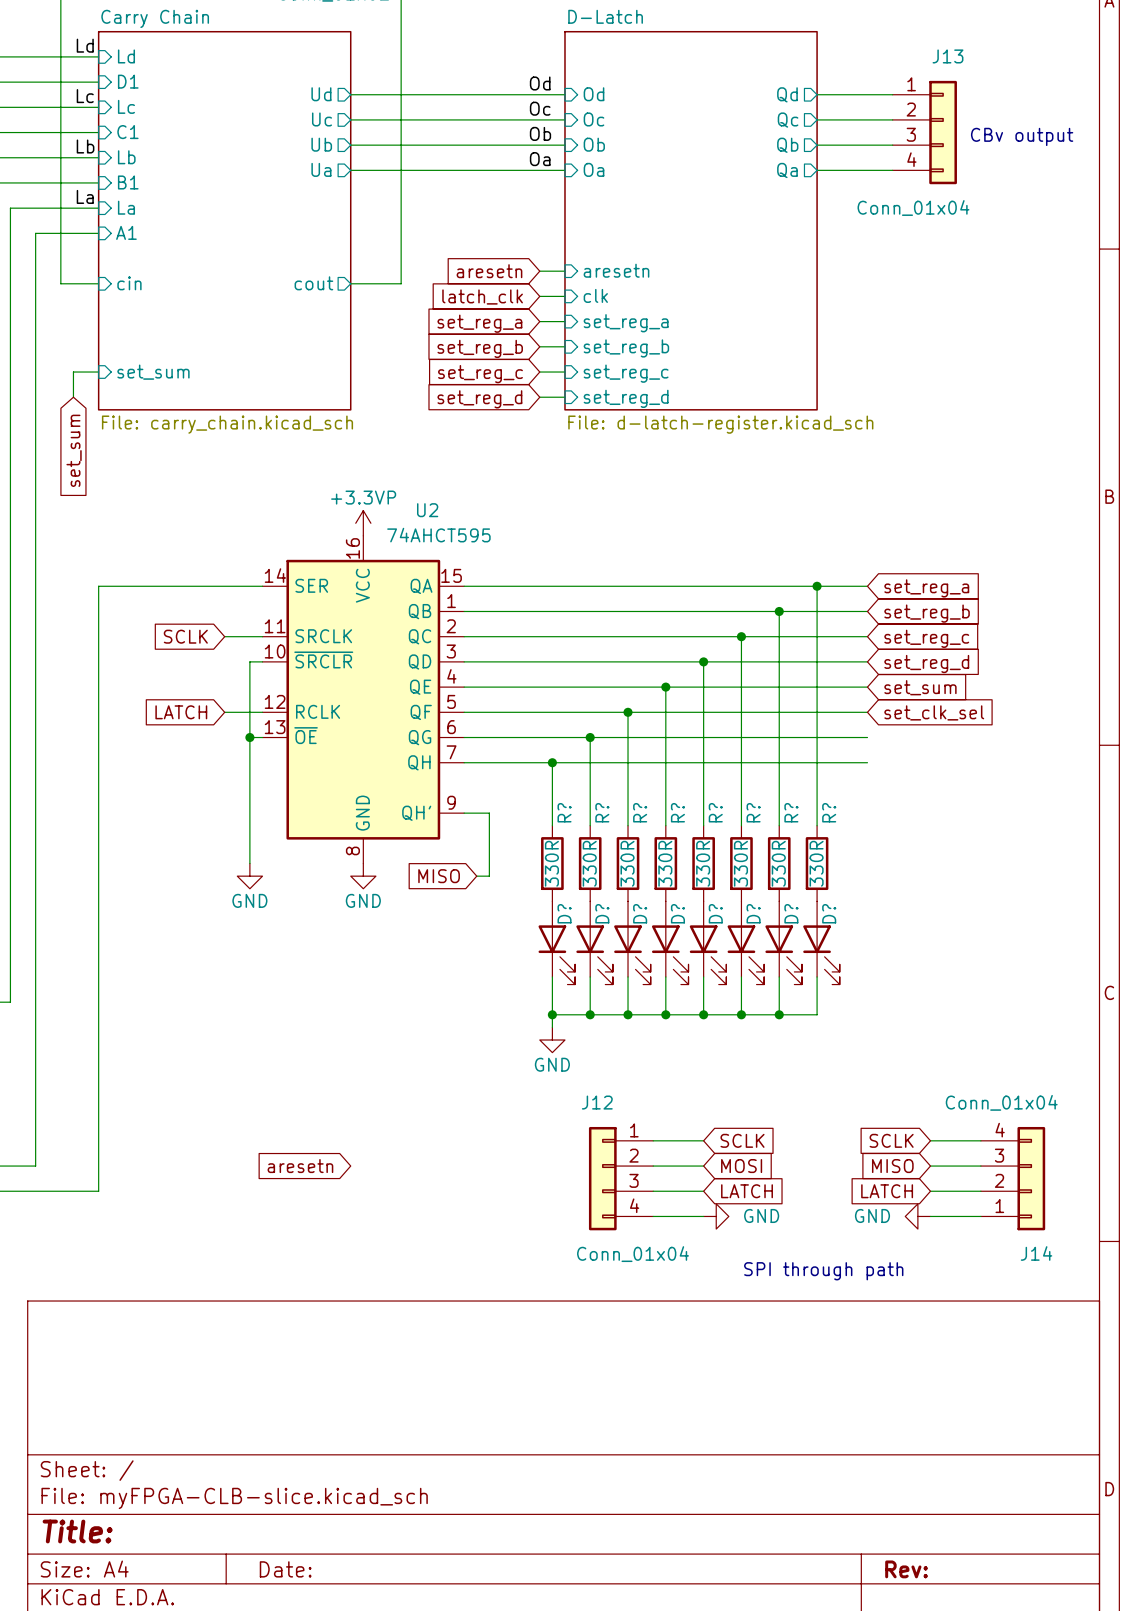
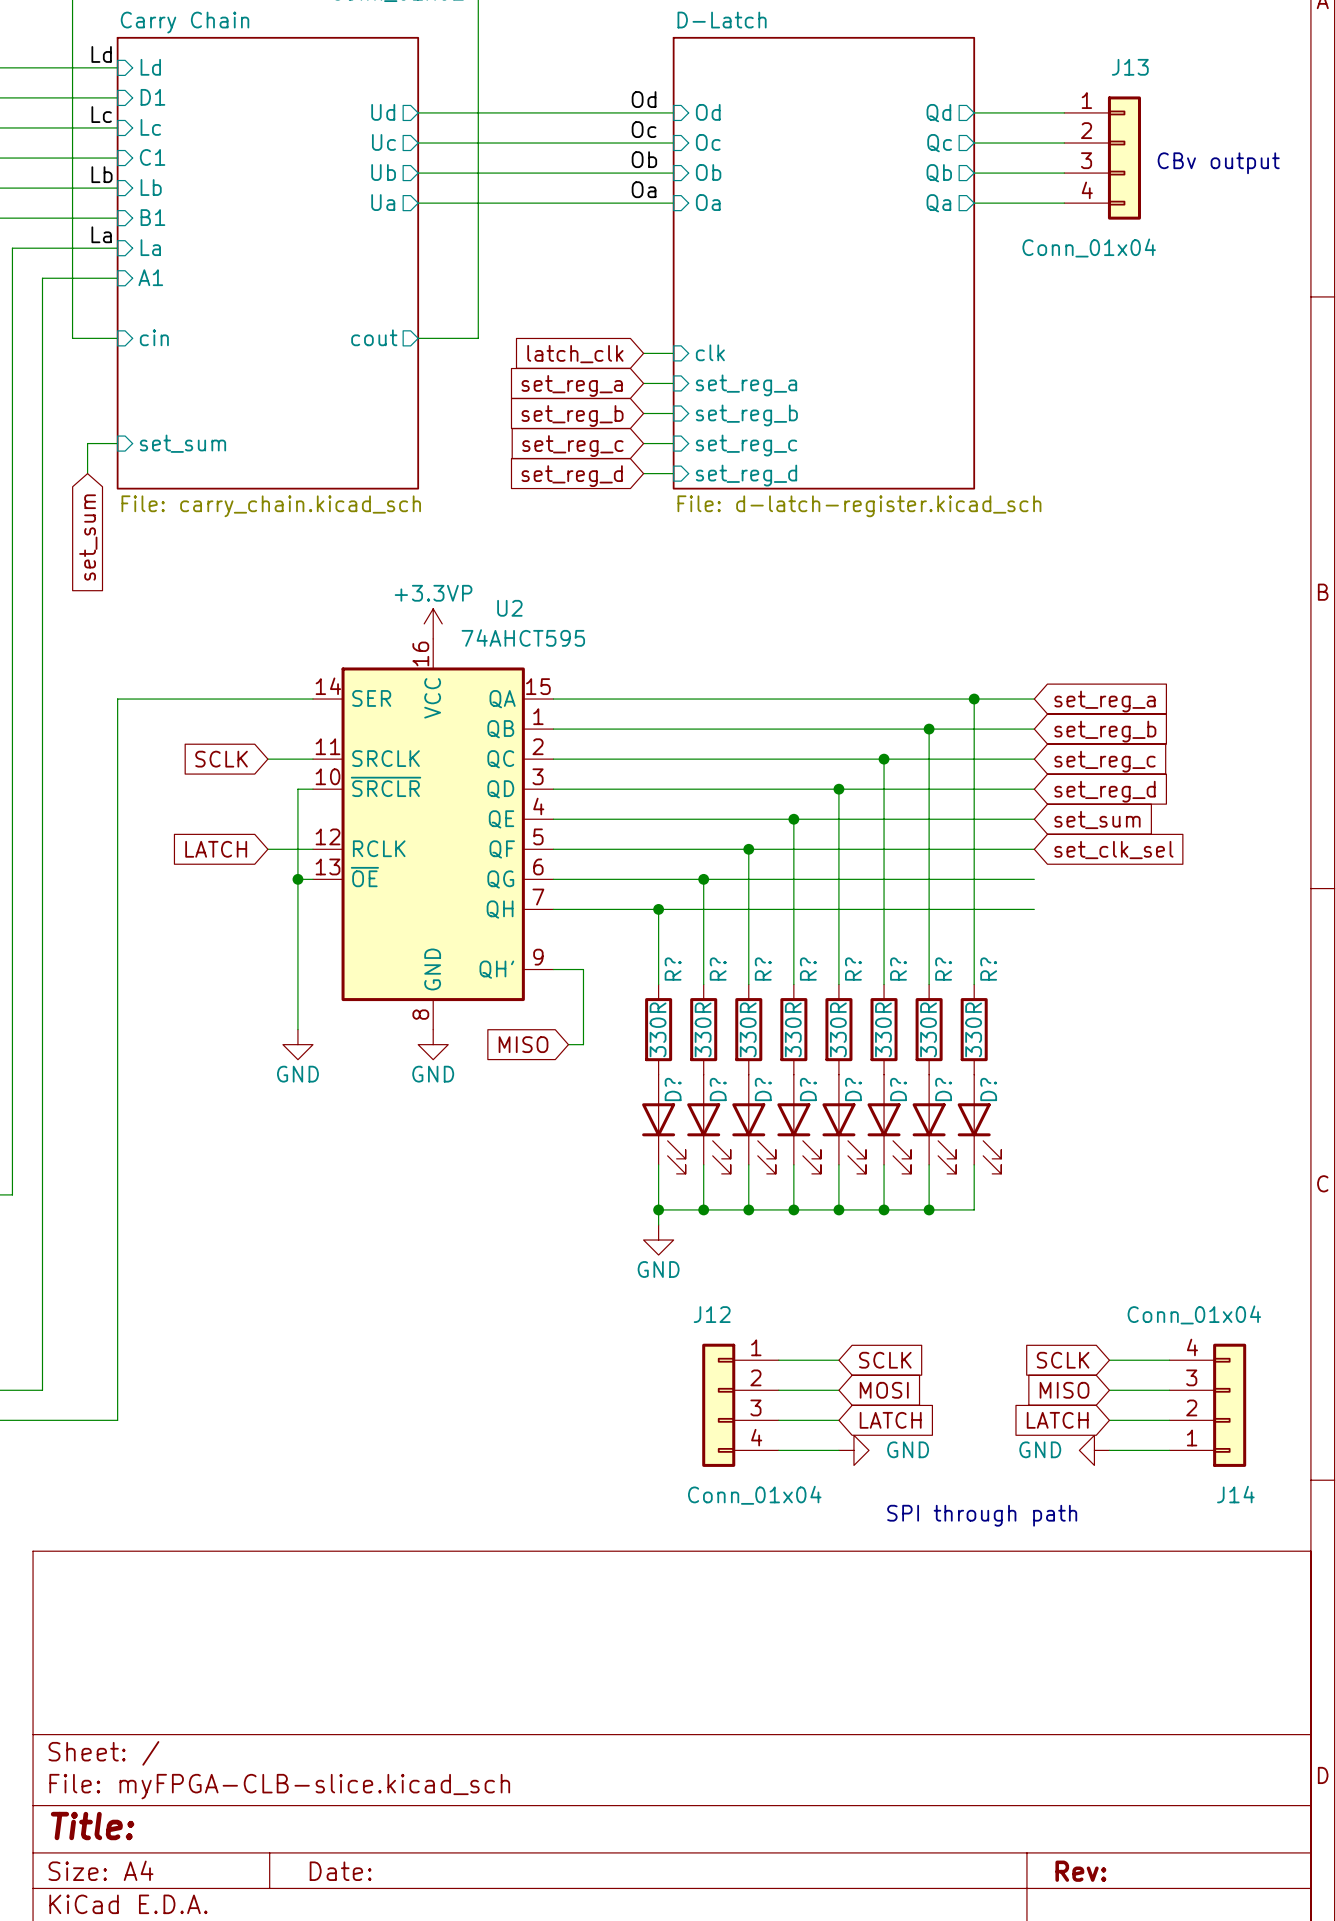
sheet pin: aresetn (616, 270) -> none
global label: aresetn (489, 271) -> none
wire: (539, 271) (564, 271) -> none
global label: aresetn (300, 1166) -> none

